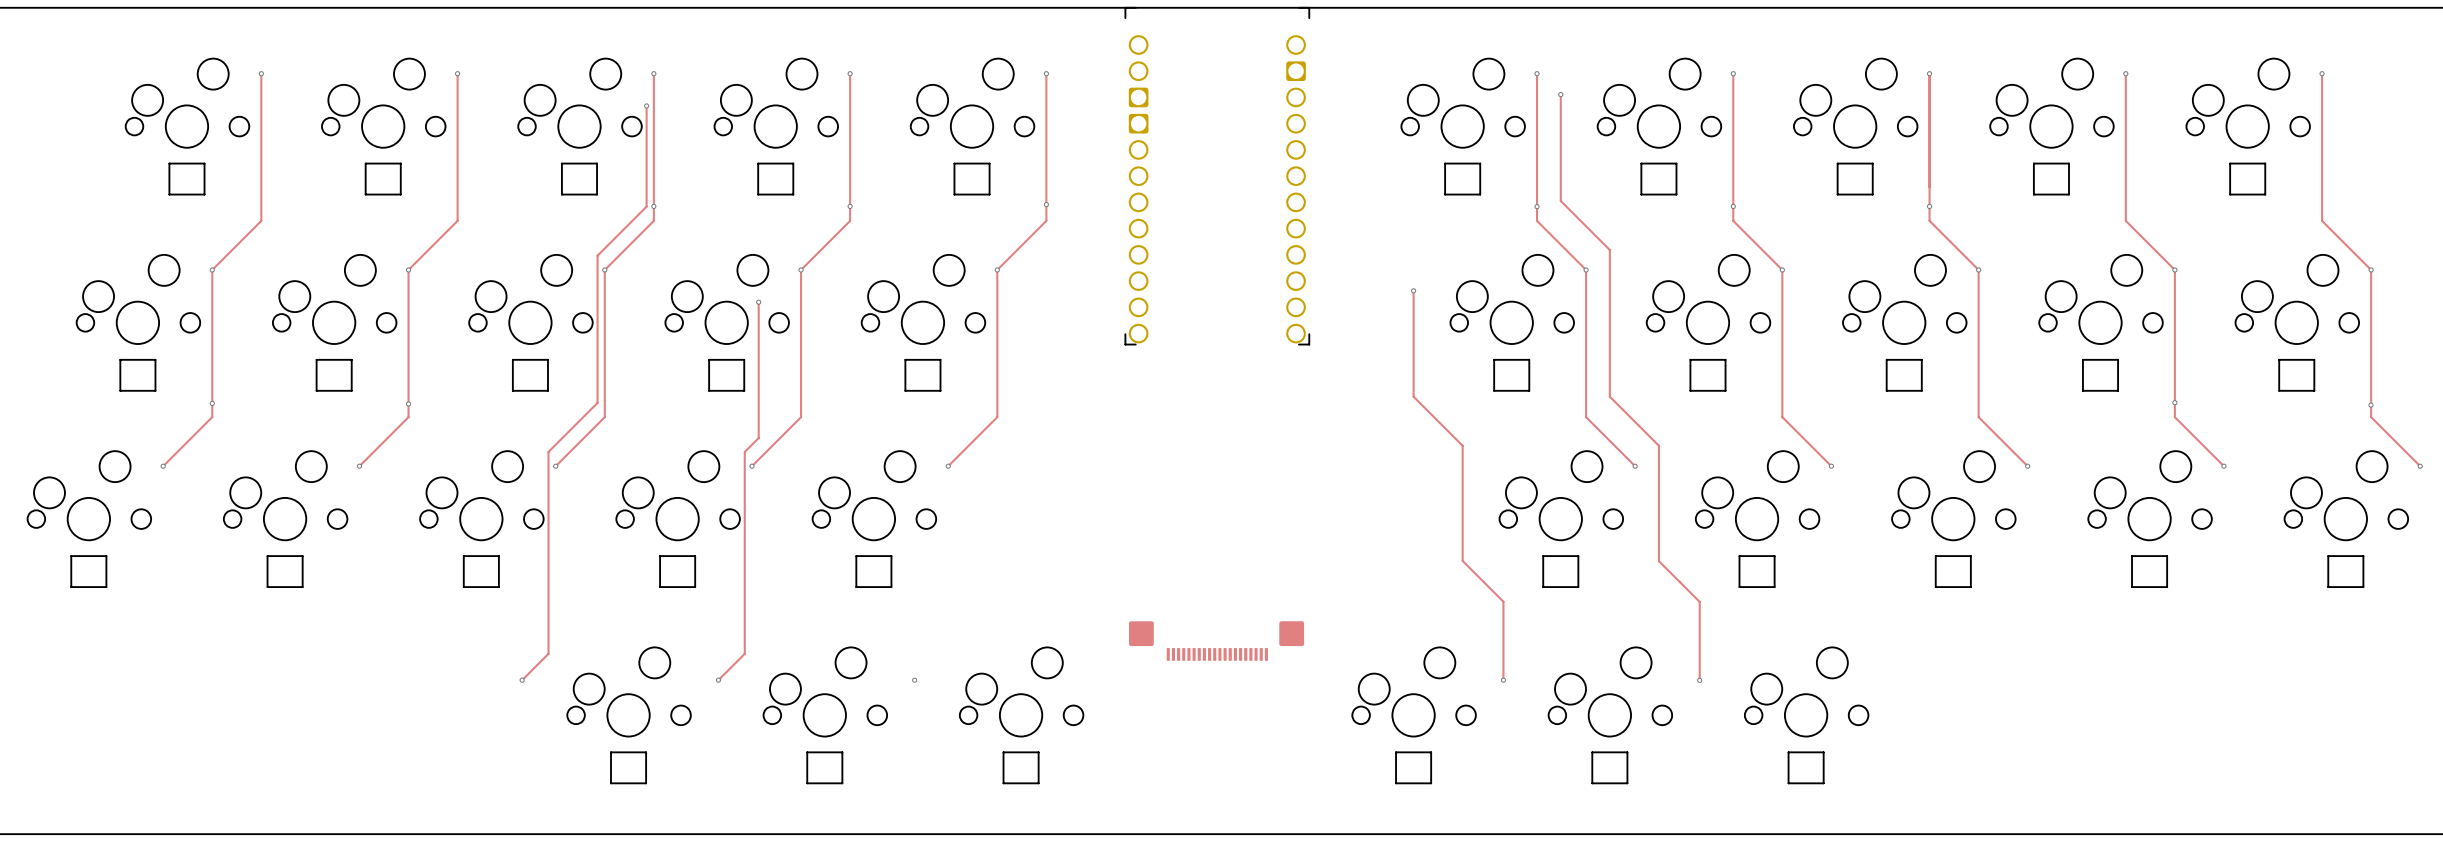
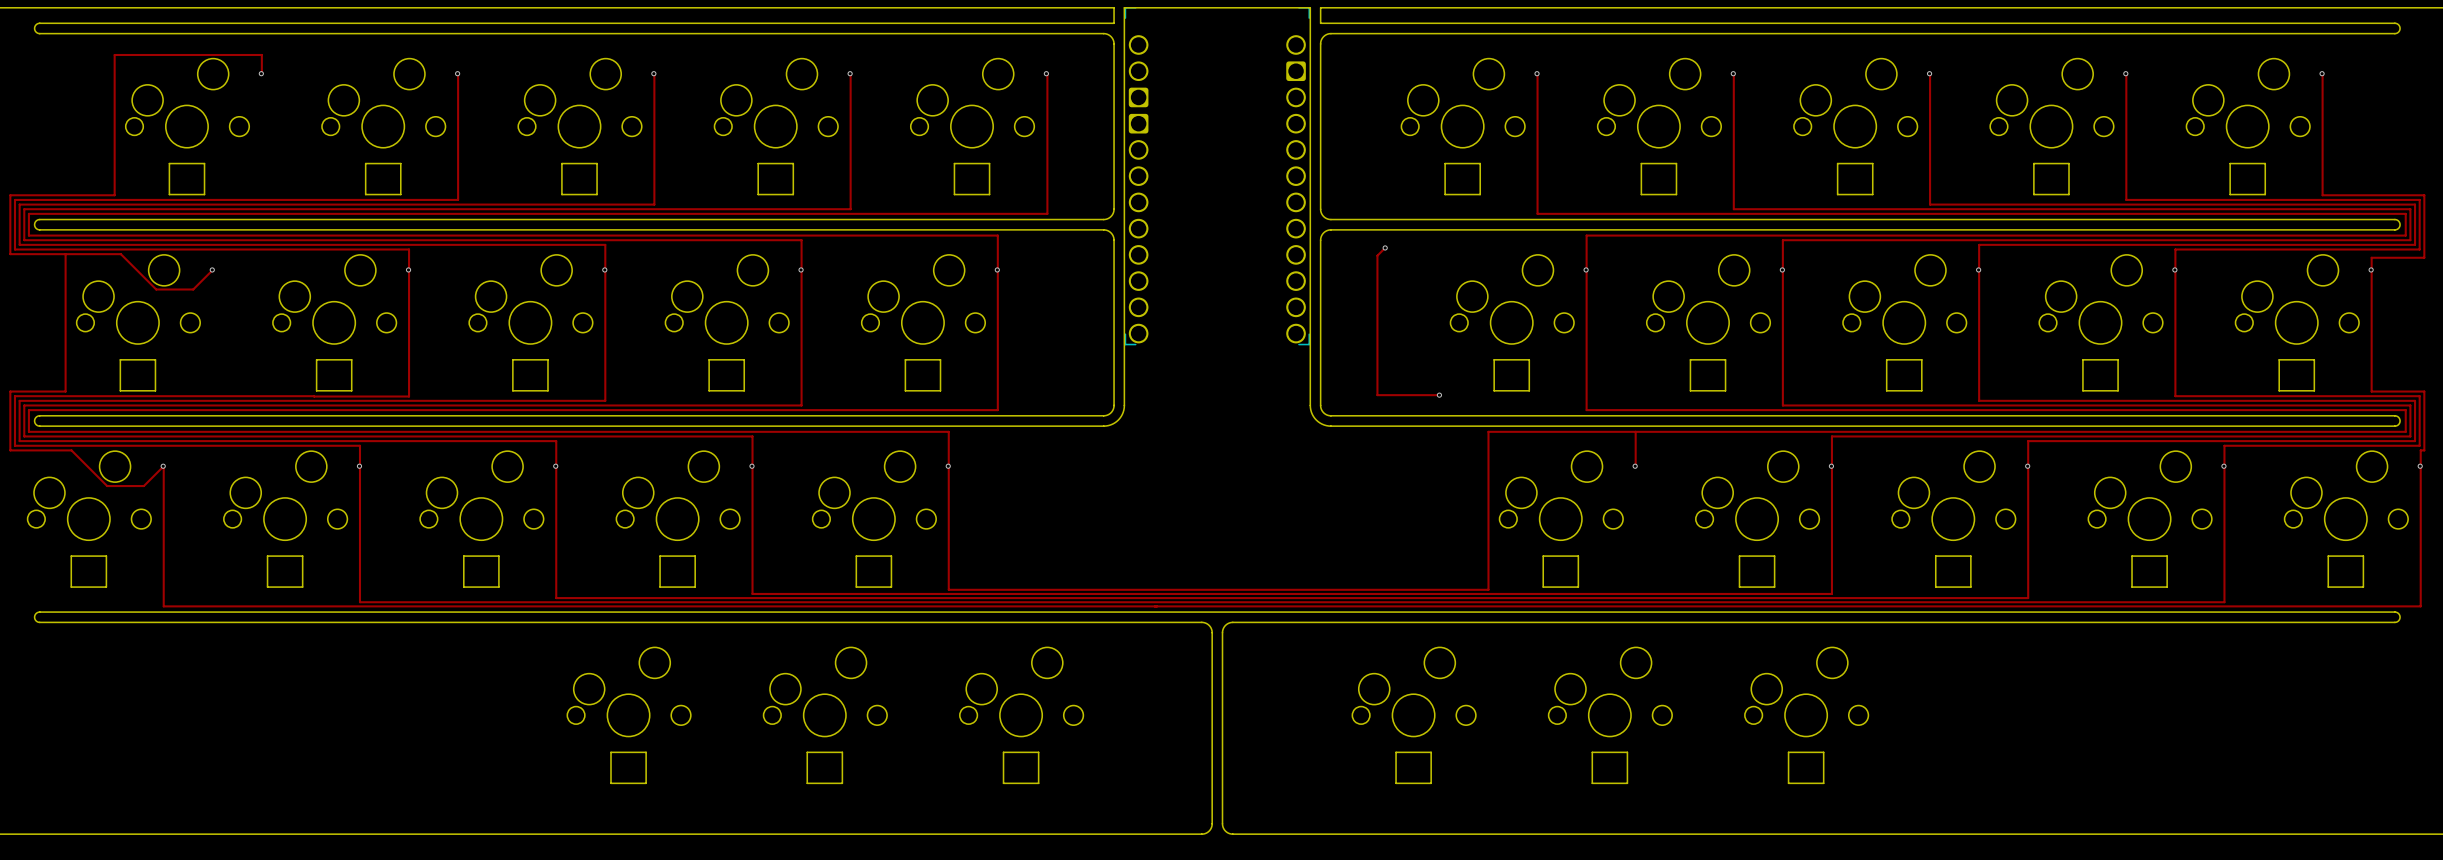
board edge: (1114, 7) (1124, 7) -> (1114, 7) (1114, 23) (39, 23) (36, 24) (34, 28) (36, 32) (39, 33) (1107, 34) (1111, 37) (1114, 43) (1114, 209) (1111, 215) (1106, 219) (39, 219) (36, 221) (34, 224) (36, 228) (39, 229) (1106, 230) (1111, 233) (1114, 240) (1114, 405) (1112, 410) (1107, 415) (39, 415) (35, 417) (35, 422) (39, 426) (1110, 424) (1121, 416) (1124, 405) (1124, 7)
board edge: (1310, 7) (1320, 7) -> (1310, 7) (1310, 405) (1313, 416) (1324, 424) (2394, 426) (2399, 422) (2398, 417) (2394, 415) (1327, 415) (1322, 411) (1320, 405) (1320, 240) (1322, 233) (1328, 230) (2394, 229) (2398, 228) (2400, 224) (2398, 221) (2394, 219) (1328, 219) (1322, 215) (1320, 209) (1320, 43) (1322, 37) (1327, 34) (2394, 33) (2398, 32) (2400, 28) (2398, 24) (2394, 23) (1320, 23) (1320, 7)
track: (261, 73) (261, 220) (212, 269) (212, 417) (163, 466) -> none
track: none -> (261, 73) (261, 54) (114, 54) (114, 195) (10, 195) (10, 254) (120, 254) (156, 289) (193, 289) (212, 269)
track: (457, 73) (457, 220) (408, 269) (408, 417) (359, 466) -> none
track: none -> (458, 73) (458, 199) (14, 199) (14, 249) (409, 249) (409, 396) (14, 396) (14, 445) (359, 445) (359, 602) (2224, 602) (2224, 445) (2419, 445) (2419, 396) (2175, 396) (2175, 249) (2419, 249) (2419, 199) (2126, 199) (2126, 73)
track: (653, 73) (653, 220) (604, 269) (604, 417) (555, 466) -> none
track: none -> (654, 73) (654, 204) (19, 204) (19, 244) (605, 244) (605, 400) (19, 400) (19, 441) (556, 441) (556, 598) (2028, 598) (2028, 441) (2415, 441) (2415, 400) (1979, 400) (1979, 244) (2415, 244) (2415, 204) (1930, 204) (1930, 73)
track: (850, 73) (850, 220) (801, 269) (801, 417) (751, 466) -> none
track: none -> (850, 73) (850, 209) (24, 209) (24, 240) (801, 240) (801, 405) (24, 405) (24, 436) (752, 436) (752, 593) (1831, 593) (1831, 436) (2410, 436) (2410, 405) (1782, 405) (1782, 240) (2410, 240) (2410, 209) (1733, 209) (1733, 73)
track: (1046, 73) (1046, 220) (997, 269) (997, 417) (948, 466) -> none
track: none -> (1046, 73) (1047, 213) (28, 213) (28, 235) (997, 235) (997, 410) (28, 410) (28, 431) (948, 431) (948, 589) (1488, 589) (1488, 431) (2405, 431) (2405, 410) (1586, 410) (1586, 235) (2405, 235) (2405, 213) (1537, 213) (1537, 73)
track: (1537, 73) (1537, 220) (1586, 269) (1586, 417) (1635, 466) -> none
track: (1733, 73) (1733, 220) (1782, 269) (1782, 417) (1831, 466) -> none
track: (1929, 73) (1929, 220) (1978, 269) (1978, 417) (2027, 466) -> none
track: (2125, 73) (2125, 220) (2174, 269) (2174, 417) (2223, 466) -> none
track: (2322, 73) (2322, 220) (2371, 269) (2371, 417) (2420, 466) -> none
track: none -> (2322, 73) (2322, 195) (2424, 195) (2424, 257) (2371, 257) (2371, 391) (2424, 391) (2424, 450) (2420, 450) (2420, 606) (163, 606) (163, 466) (143, 486) (107, 486) (71, 450) (10, 450) (10, 391) (65, 391) (65, 254)
track: (1560, 94) (1560, 200) (1609, 250) (1609, 396) (1658, 445) (1658, 561) (1699, 601) (1699, 680) -> none
via: (1560, 94) -> none
track: (646, 105) (646, 206) (597, 255) (597, 402) (548, 451) (548, 653) (522, 680) -> none
via: (646, 105) -> none
via: (1046, 204) -> none
via: (653, 206) -> none
via: (850, 206) -> none
via: (1537, 206) -> none
via: (1733, 206) -> none
via: (1929, 206) -> none
track: none -> (1385, 247) (1377, 255) (1377, 395) (1439, 395)
track: (1413, 290) (1413, 396) (1462, 445) (1462, 560) (1503, 601) (1503, 680) -> none
via position: (1413, 290) -> (1385, 247)
track: (758, 302) (758, 438) (744, 451) (744, 653) (718, 680) -> none
via: (758, 302) -> none
via: none -> (1439, 395)
via: (2174, 402) -> none
via: (212, 403) -> none
via: (408, 403) -> none
via: (2370, 405) -> none
track: none -> (1635, 431) (1635, 466)
part: (1216, 641) -> none
via: (522, 680) -> none
via: (718, 680) -> none
via: (914, 680) -> none
via: (1503, 680) -> none
via: (1699, 680) -> none
board edge: (1201, 834) (1232, 834) -> (1201, 834) (1209, 831) (1212, 823) (1212, 632) (1209, 626) (1204, 622) (39, 622) (36, 620) (34, 616) (39, 612) (2394, 612) (2400, 616) (2398, 620) (2394, 622) (1230, 622) (1224, 626) (1222, 632) (1222, 823) (1225, 831) (1232, 834)

